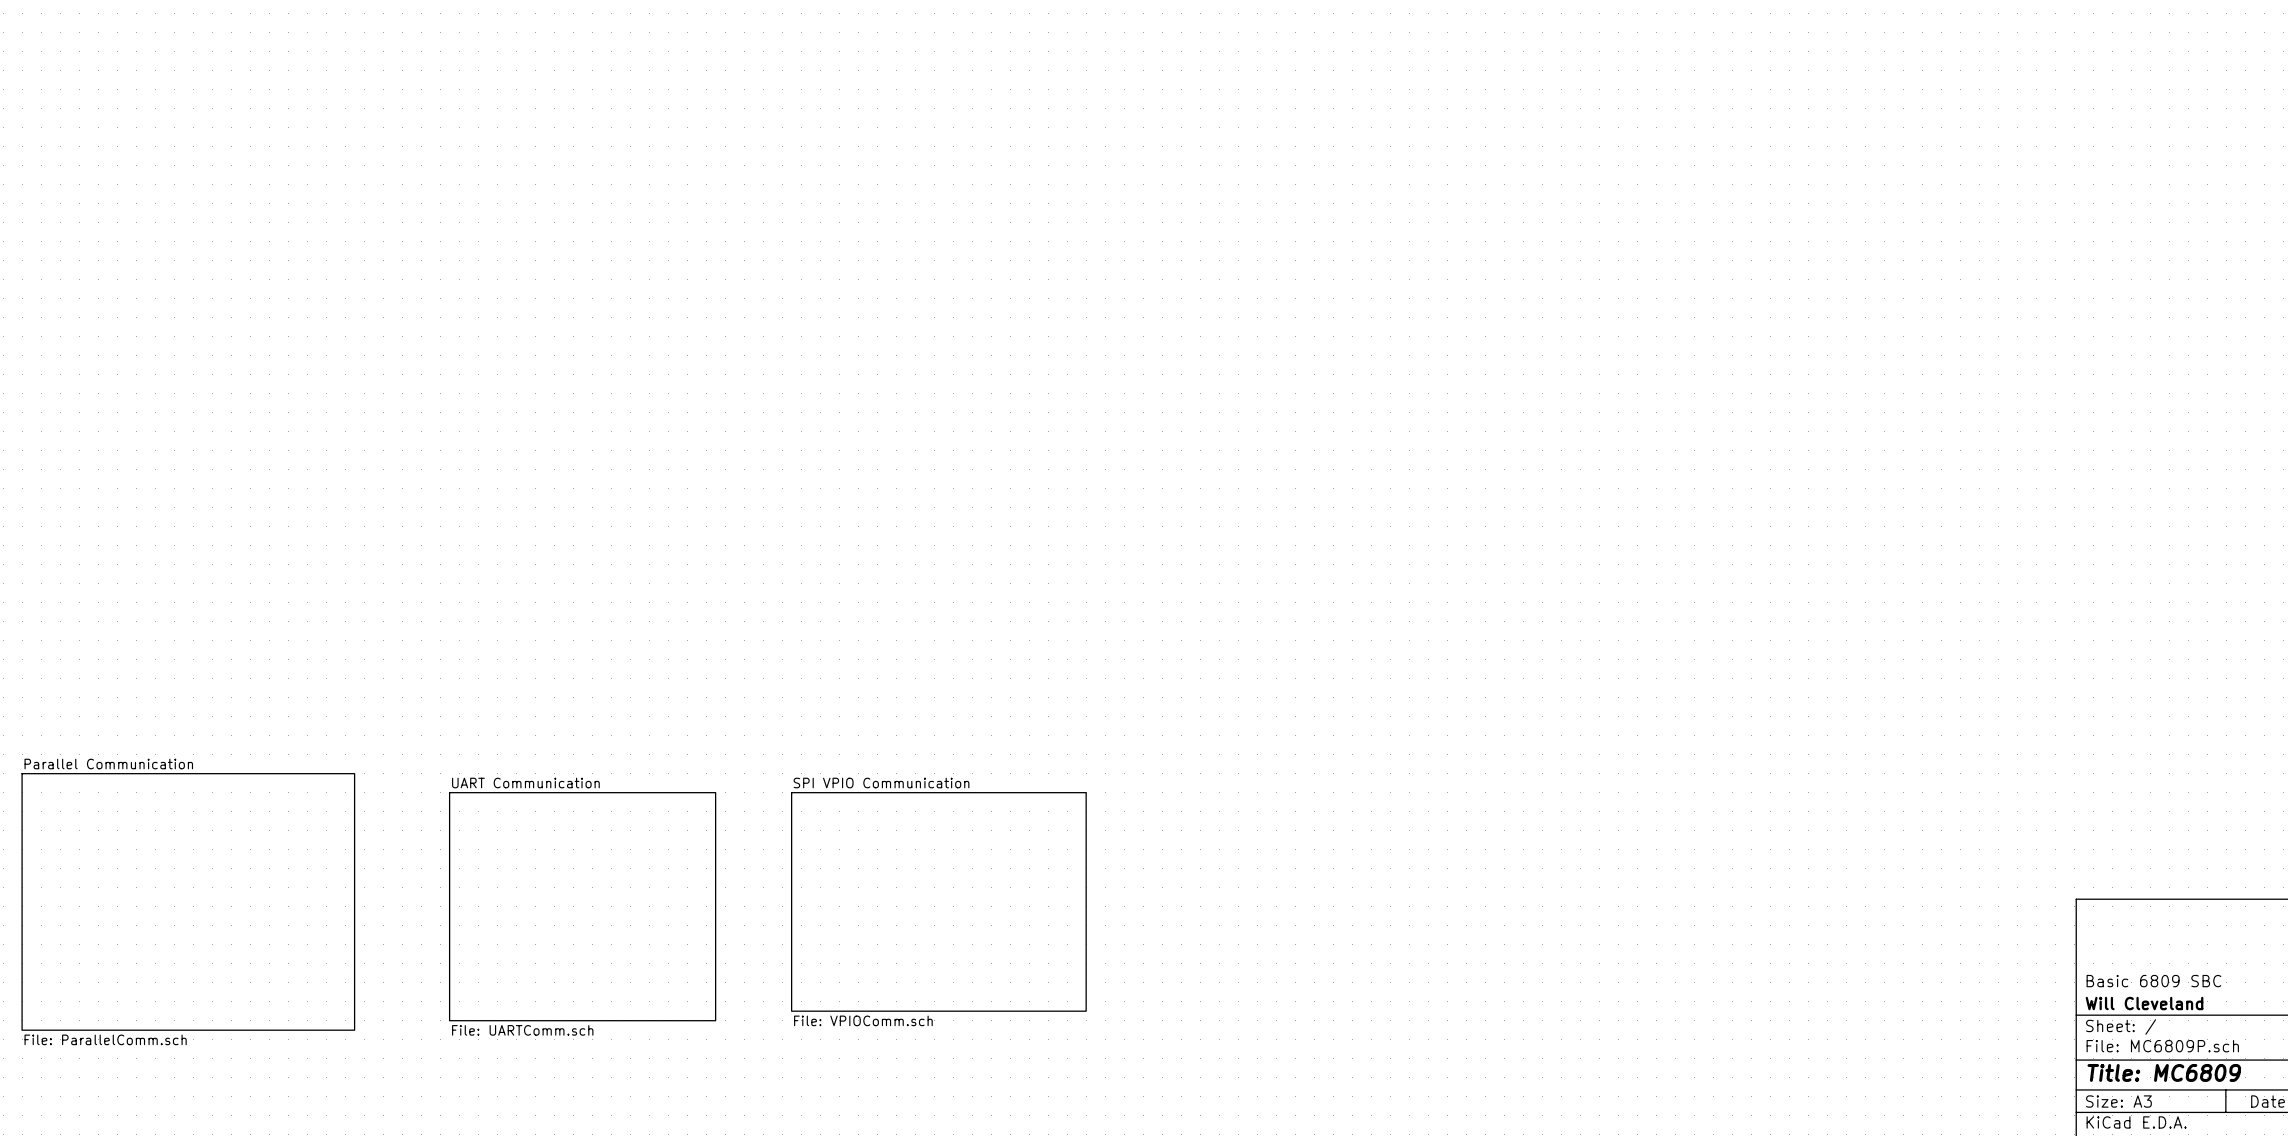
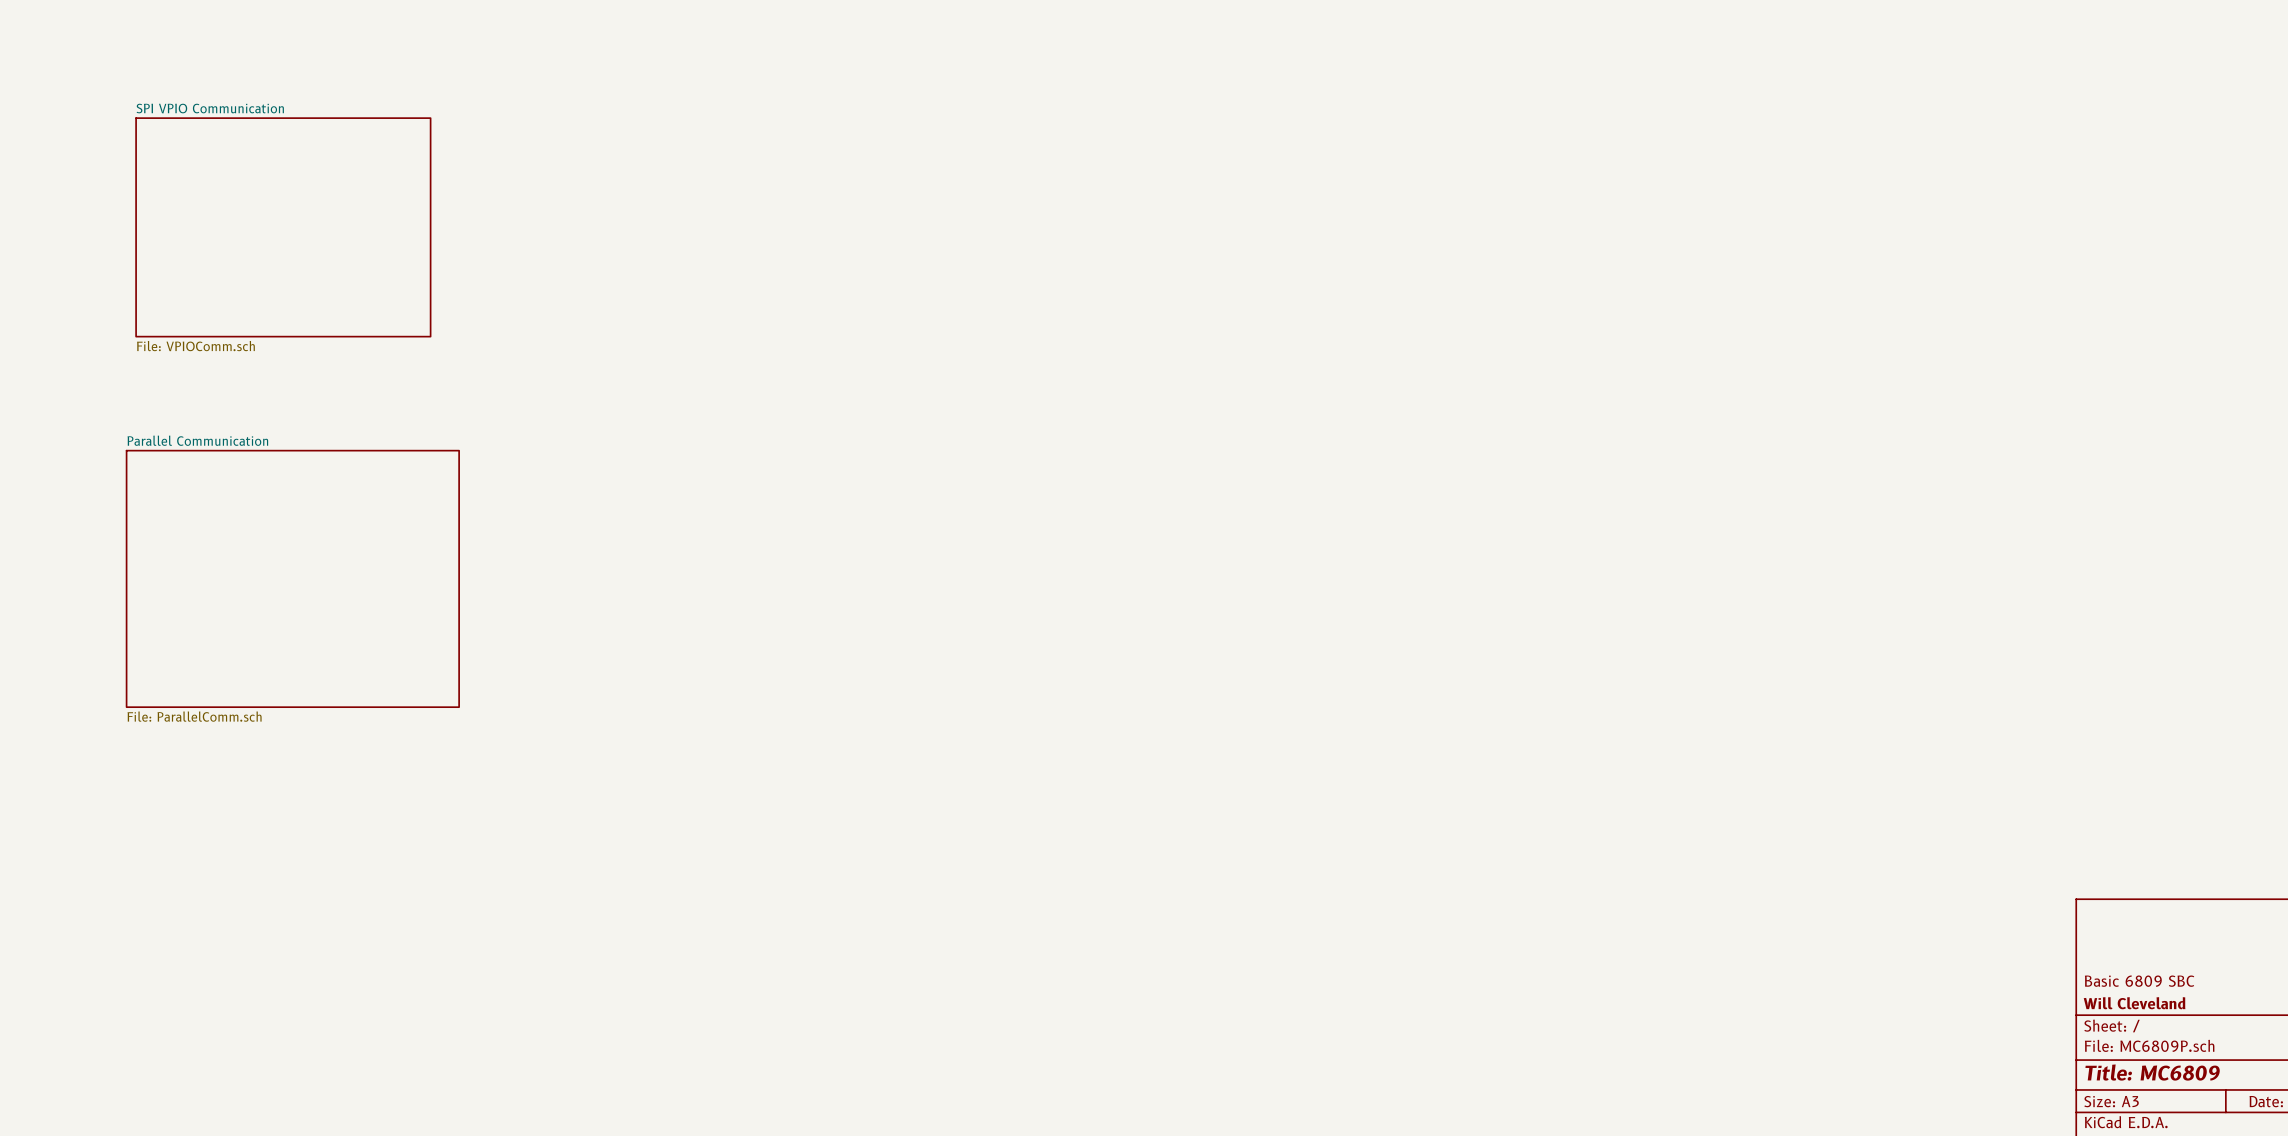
sheet SPI VPIO Communication: none -> File: VPIOComm.sch (283, 227)
sheet Parallel Communication: none -> File: ParallelComm.sch (292, 578)
sheet Parallel Communication: File: ParallelComm.sch (188, 901) -> none
sheet SPI VPIO Communication: File: VPIOComm.sch (938, 901) -> none
sheet UART Communication: File: UARTComm.sch (582, 906) -> none

